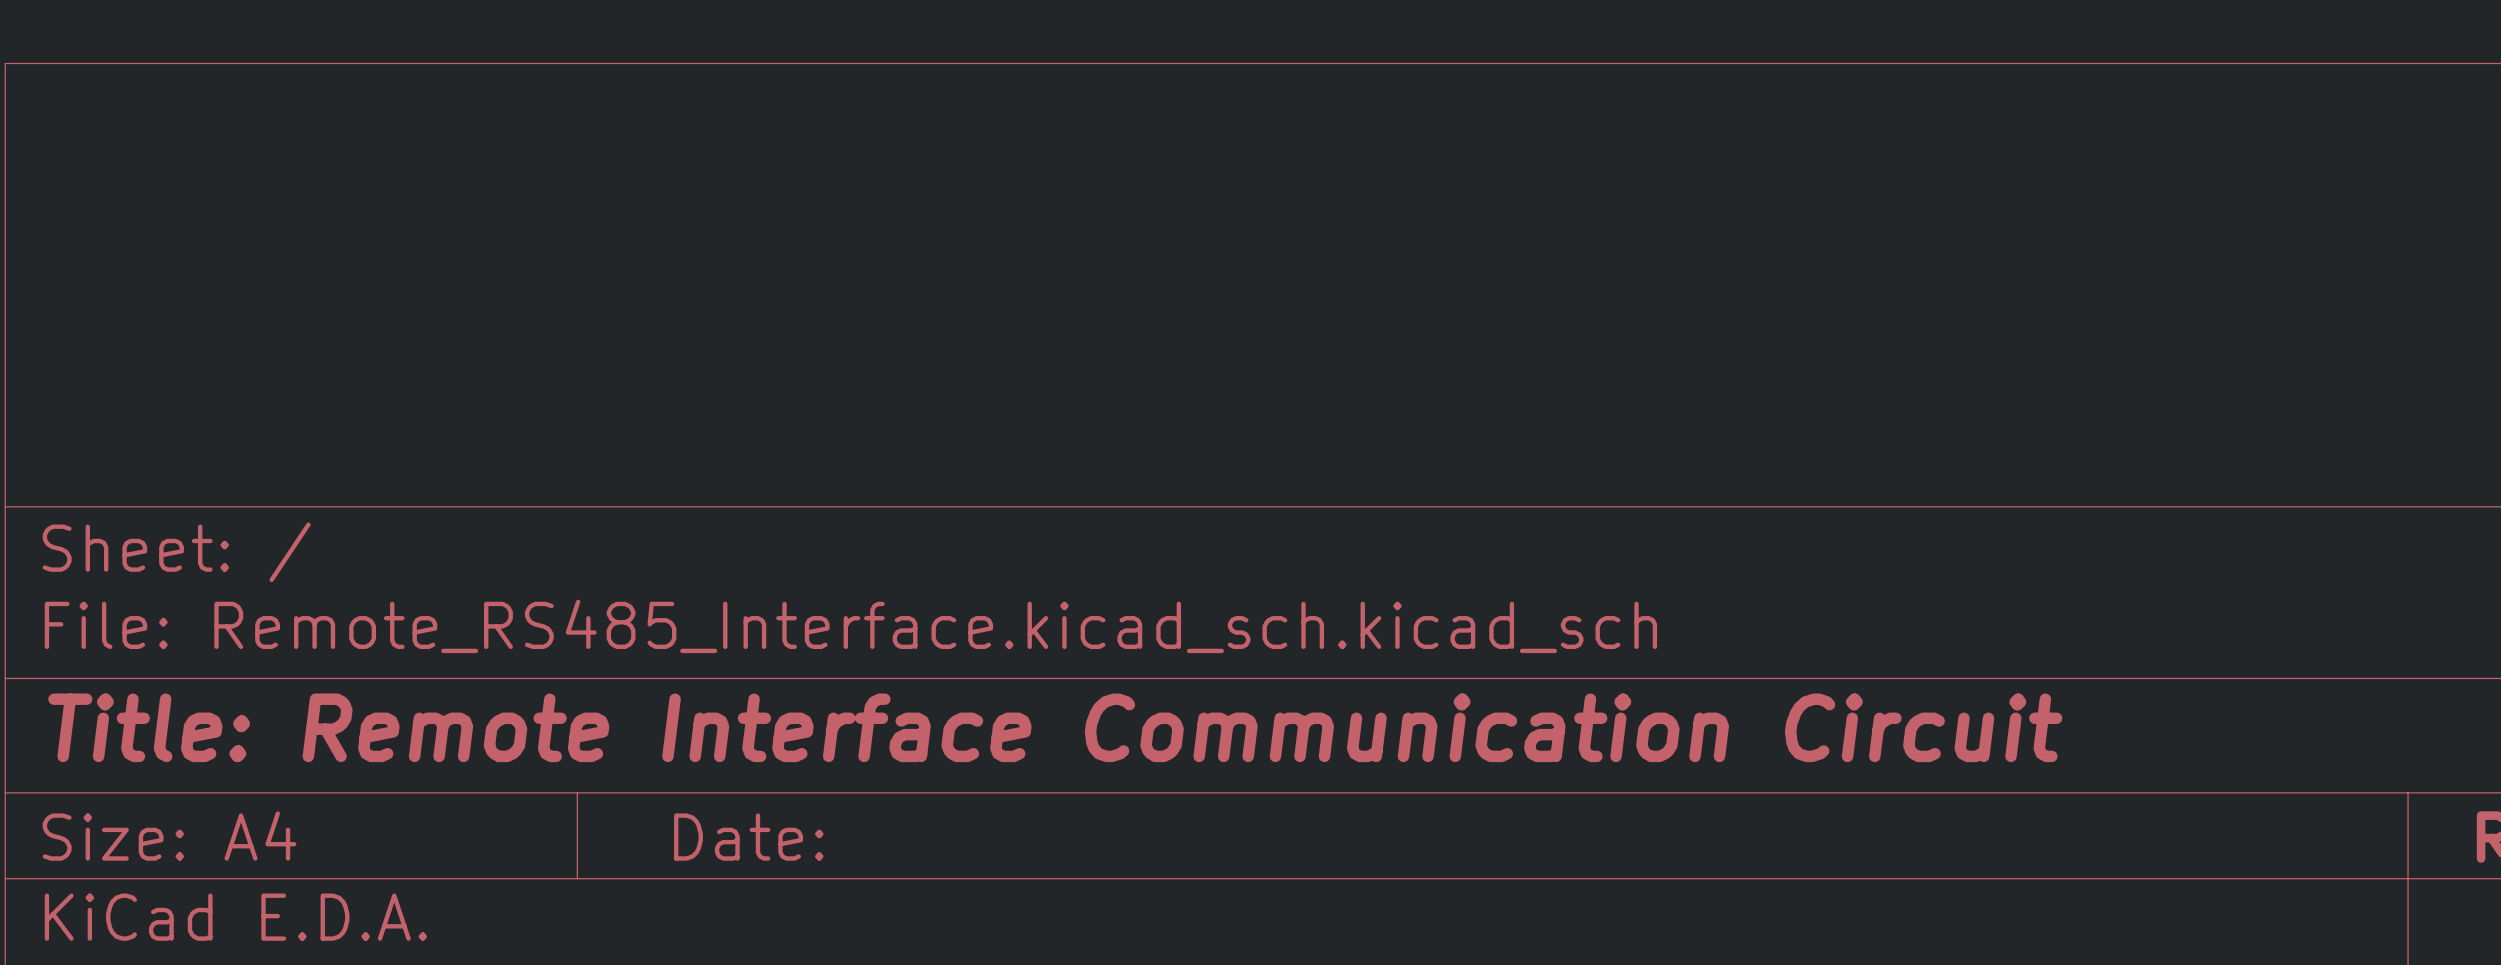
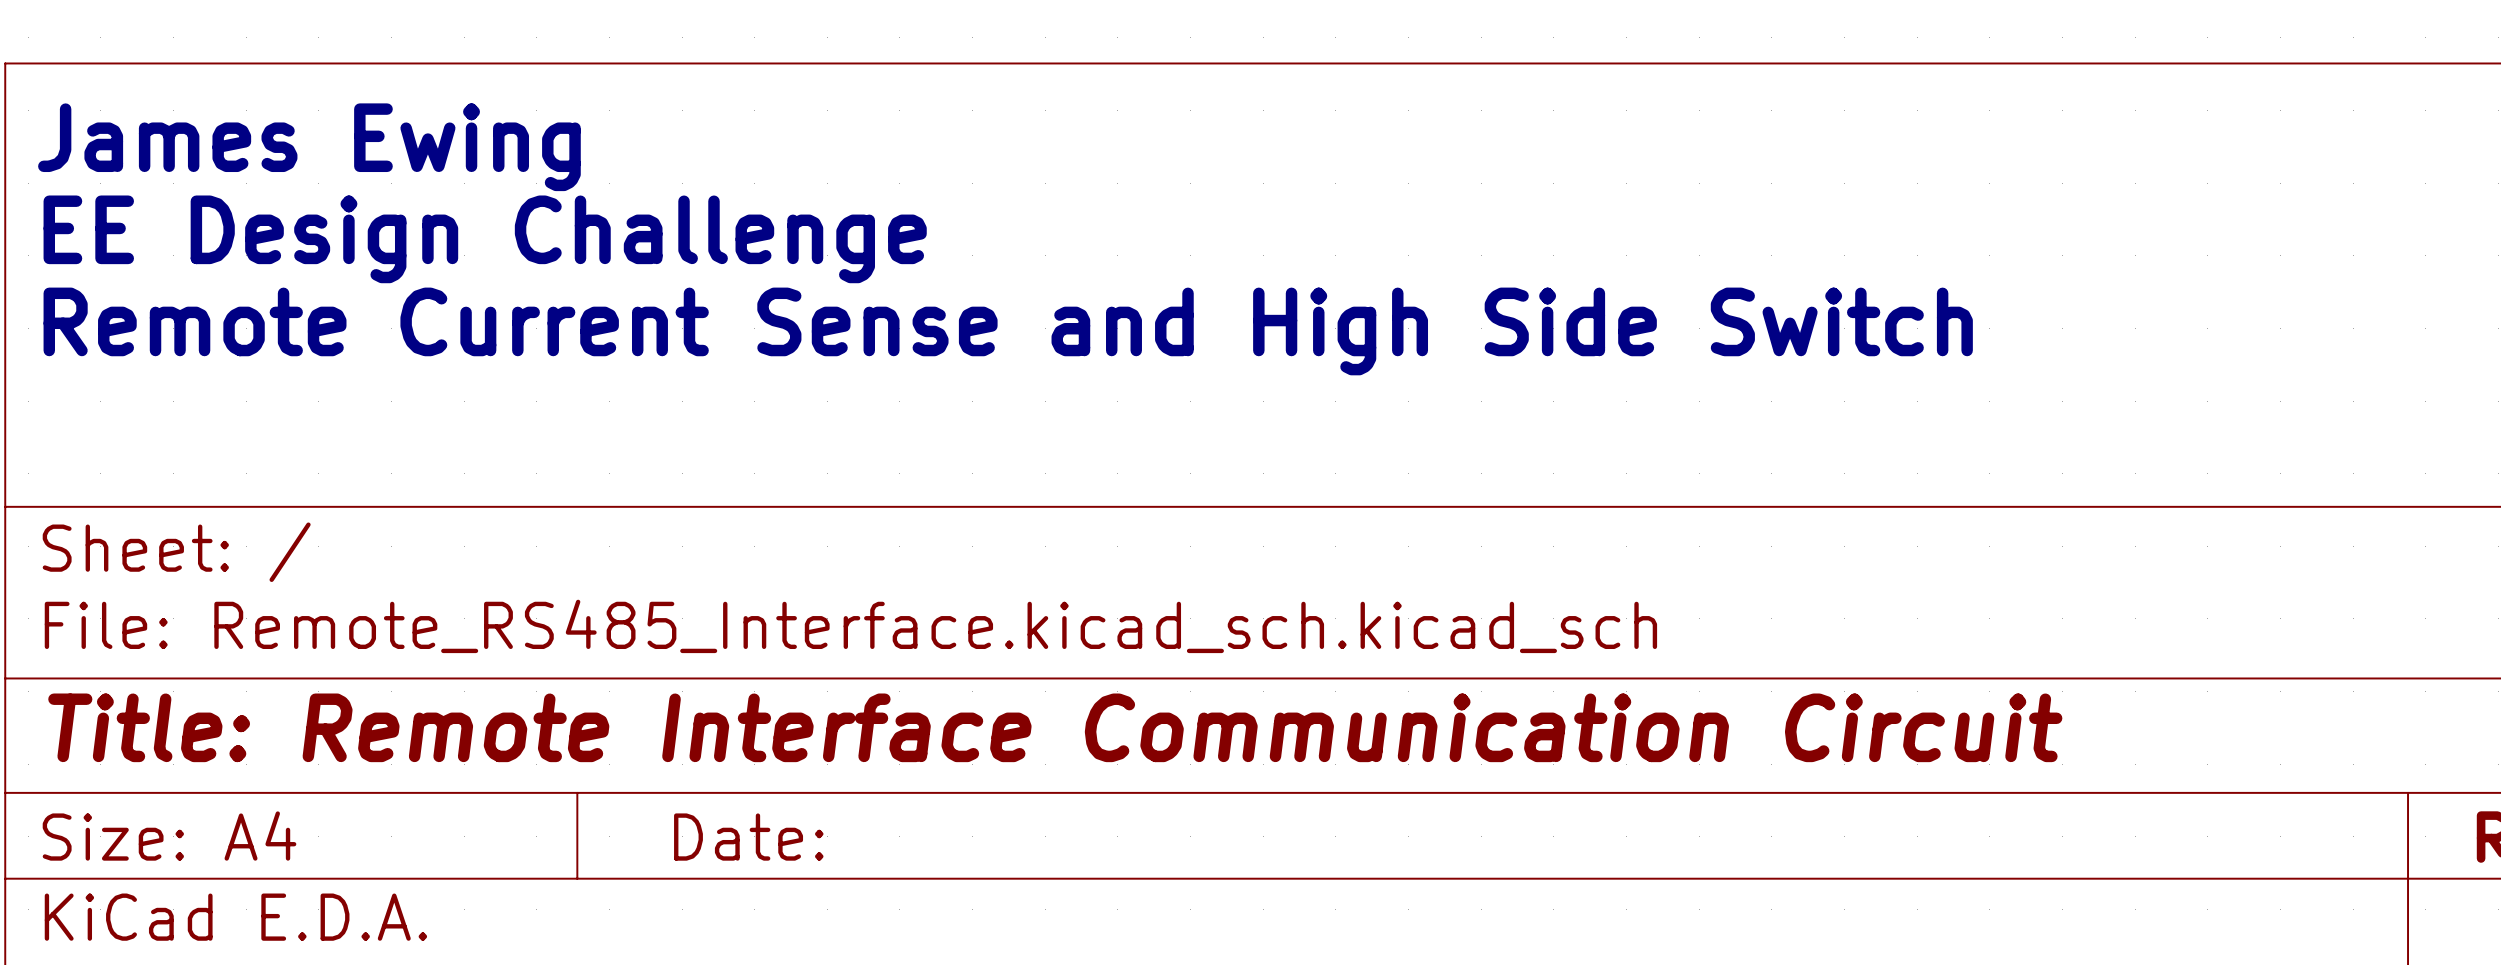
text: none -> James Ewing (309, 147)
text: none -> EE Design Challenge (485, 239)
text: none -> Remote Current Sense and High Side Switch (1008, 331)

